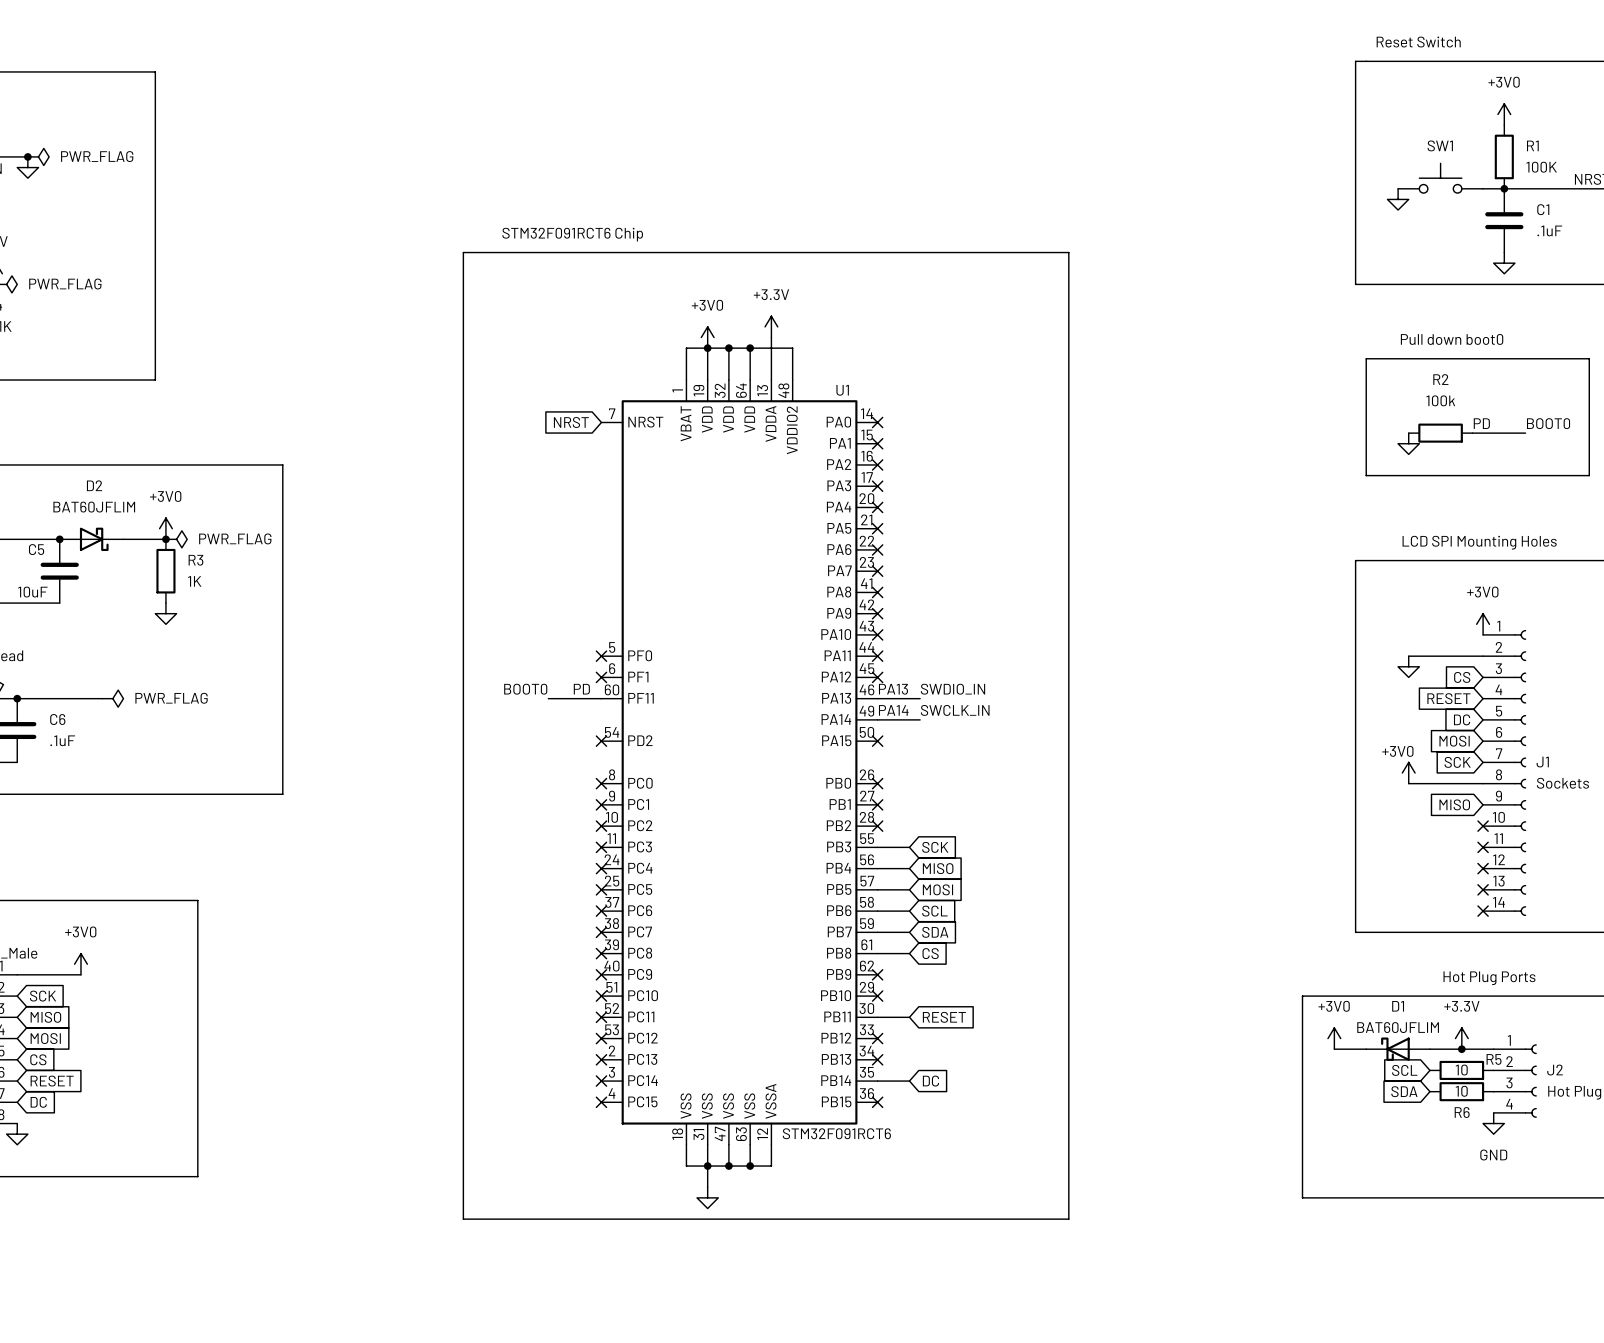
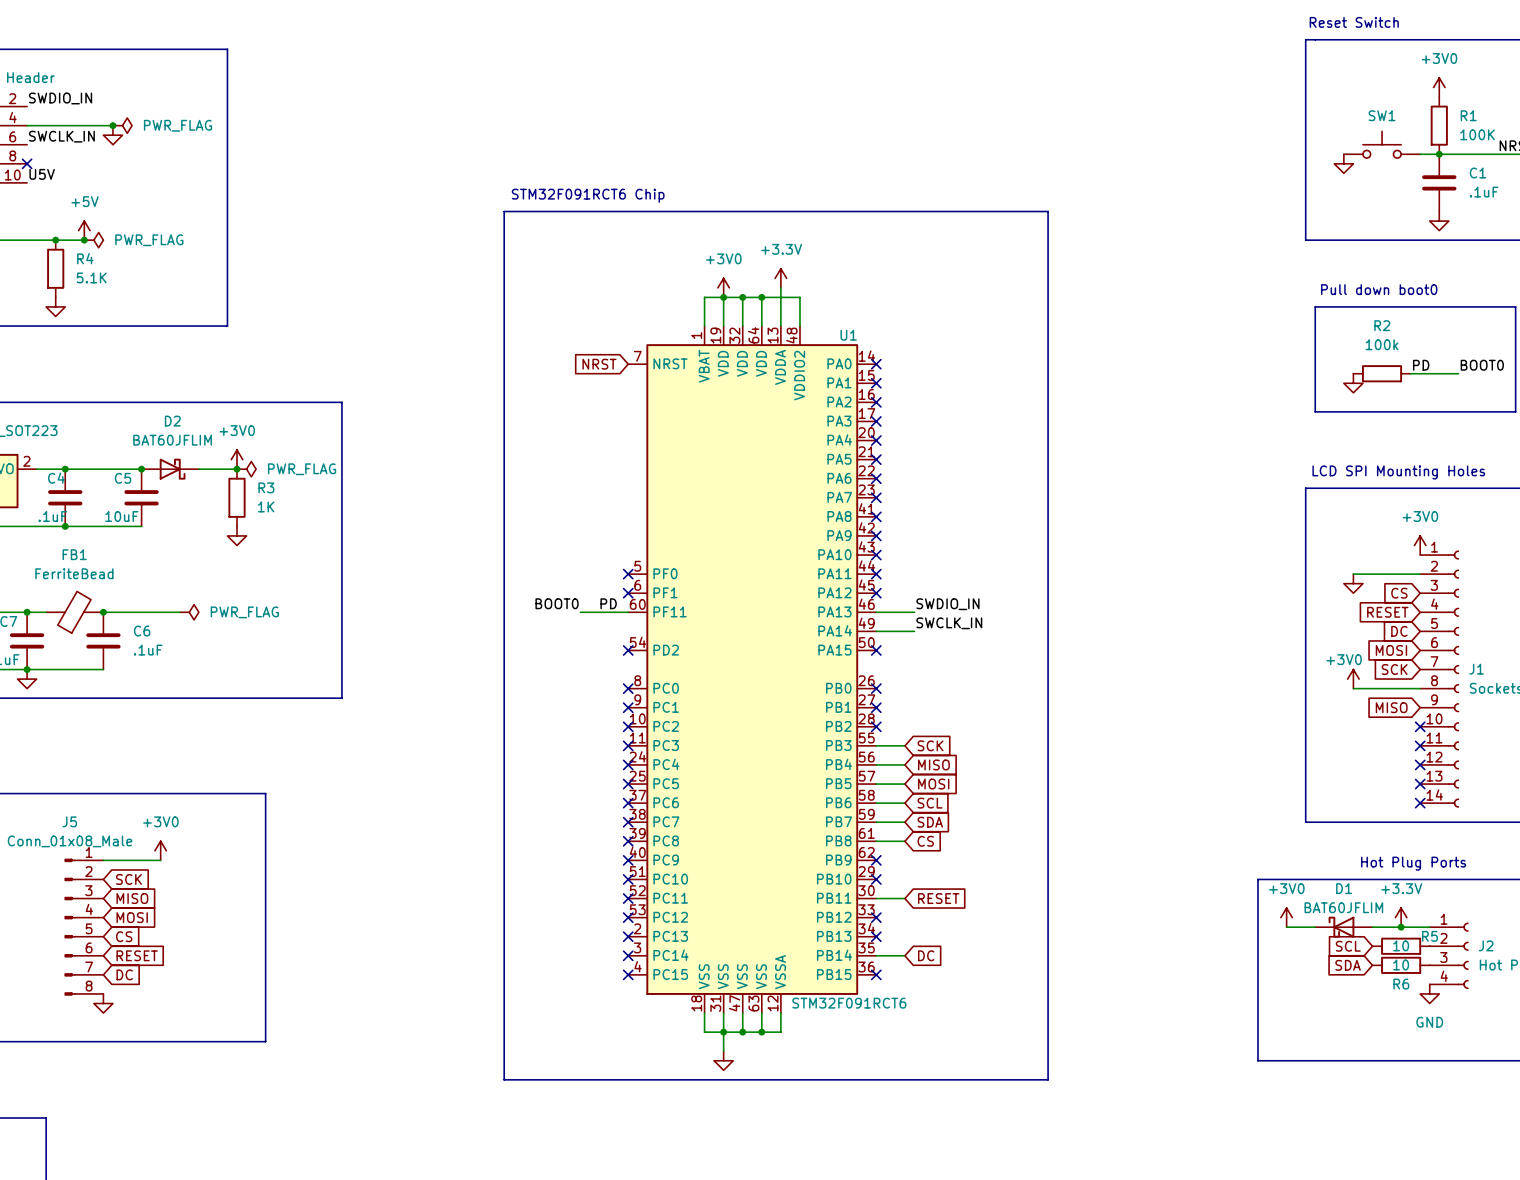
label: PA13 (893, 689) -> none
label: PA14 (893, 710) -> none

